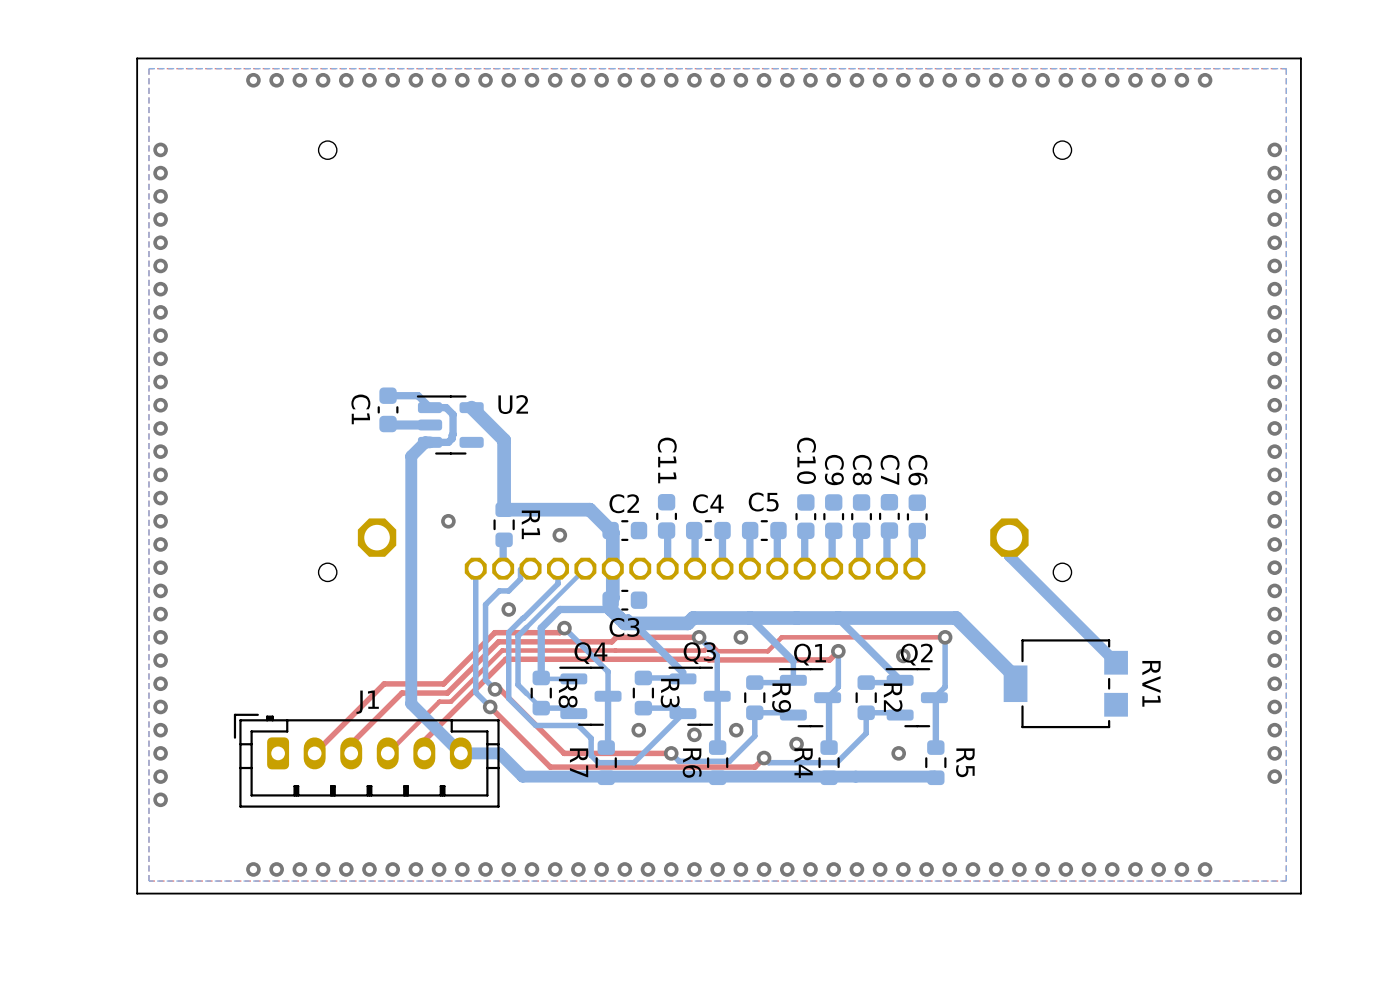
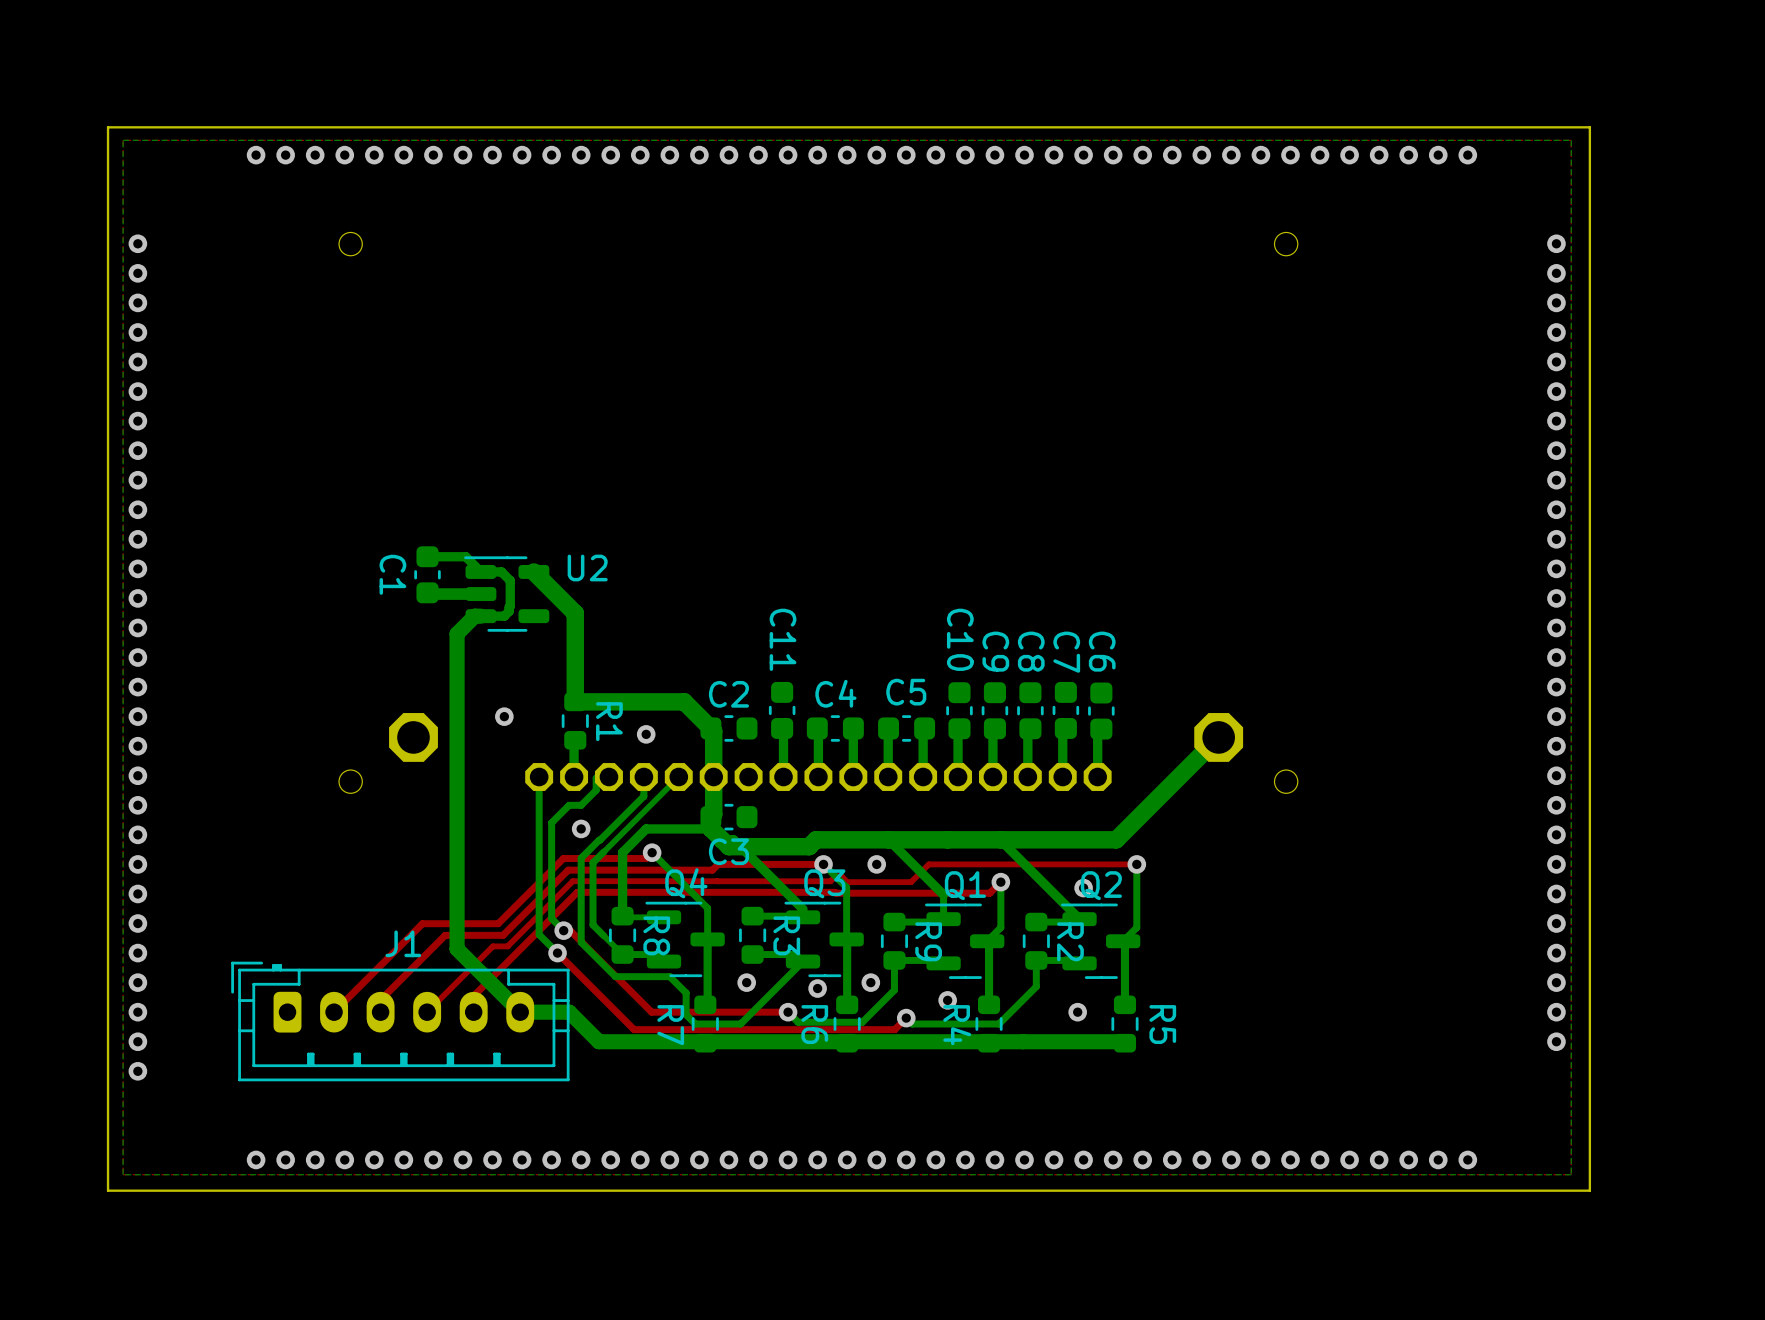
bottom track: (1009, 537) (1009, 556) (1116, 662) -> none
bottom track: (929, 618) (956, 618) (1015, 677) (1015, 683) -> (1116, 839) (1218, 737)
RV1: (1065, 683) -> none

